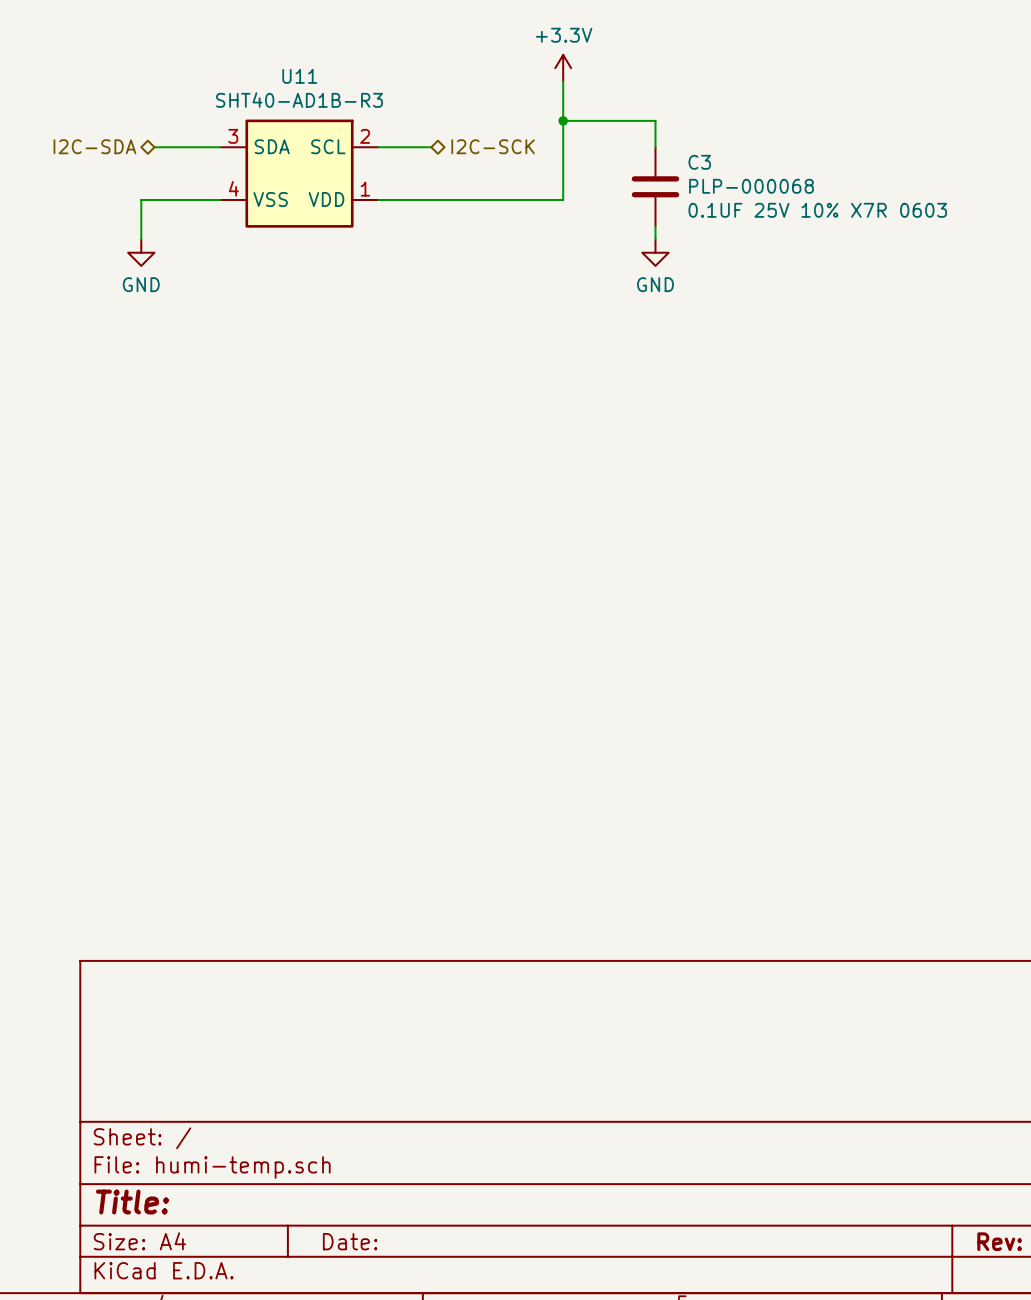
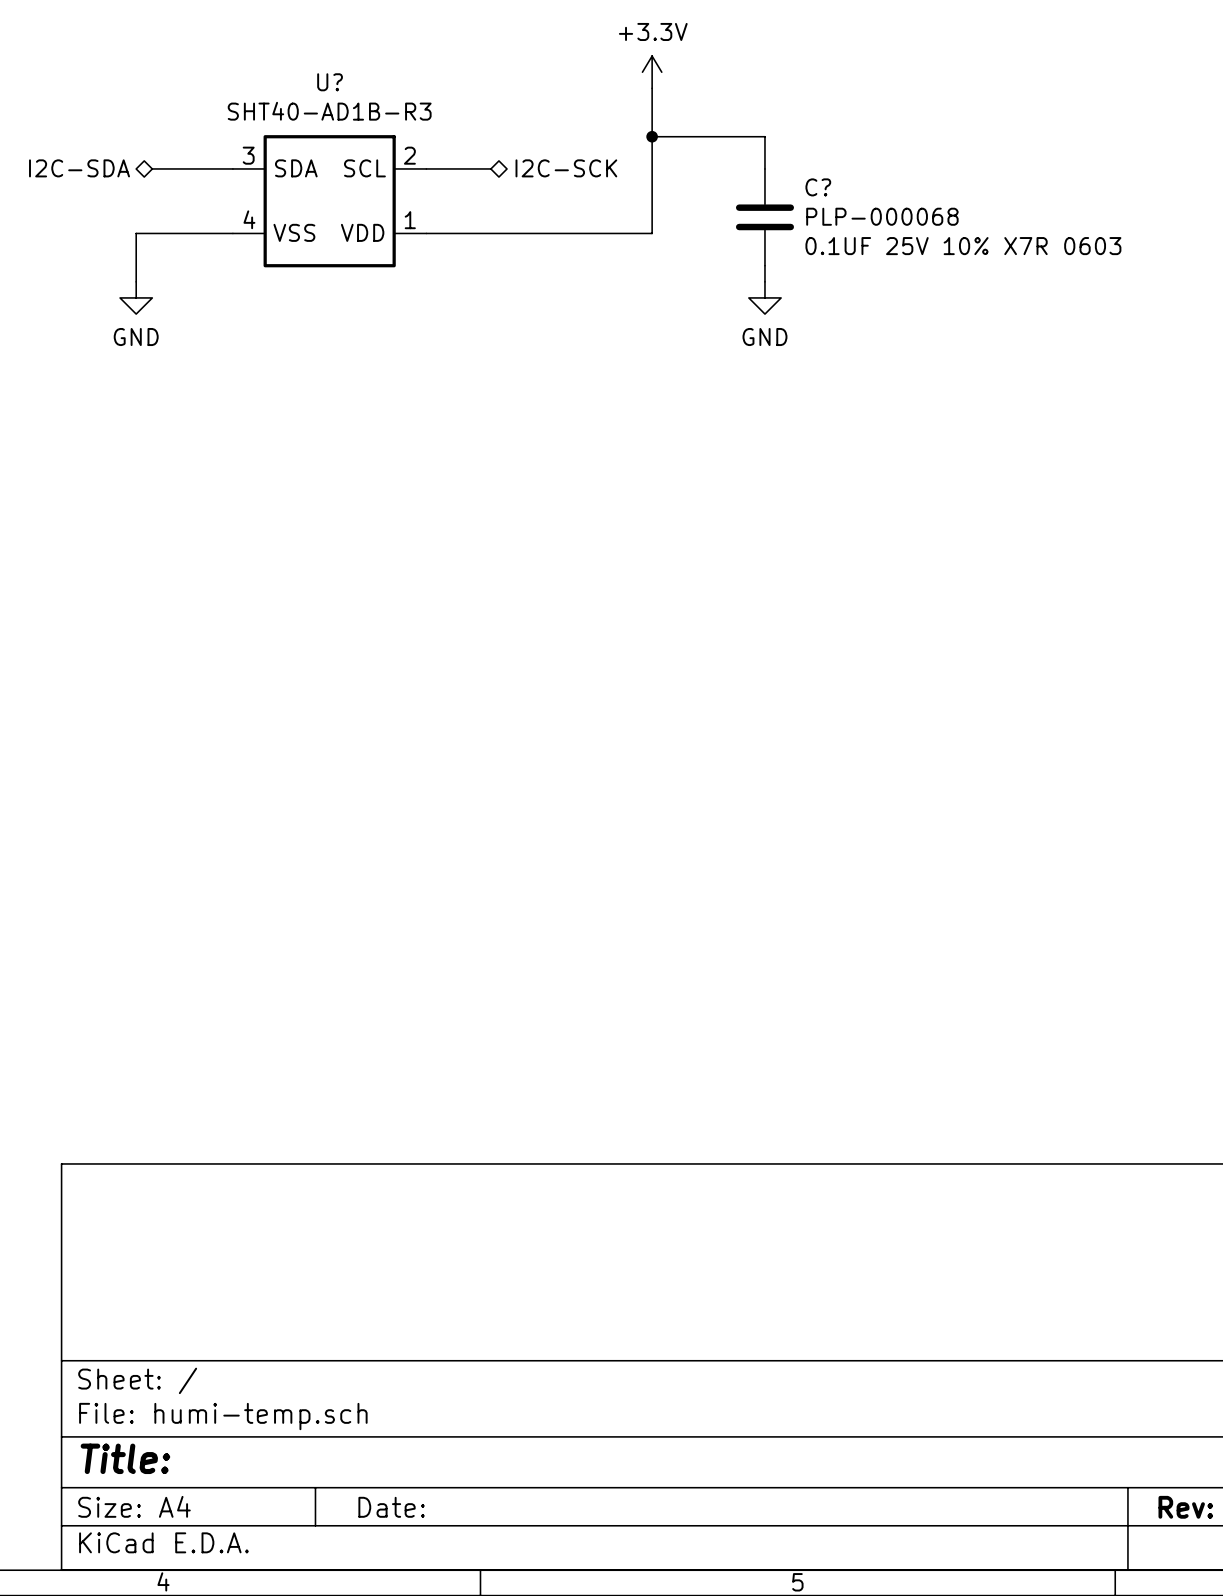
U11 name: U11 (299, 76) -> U? (330, 82)
C3 name: C3 (699, 162) -> C? (818, 187)

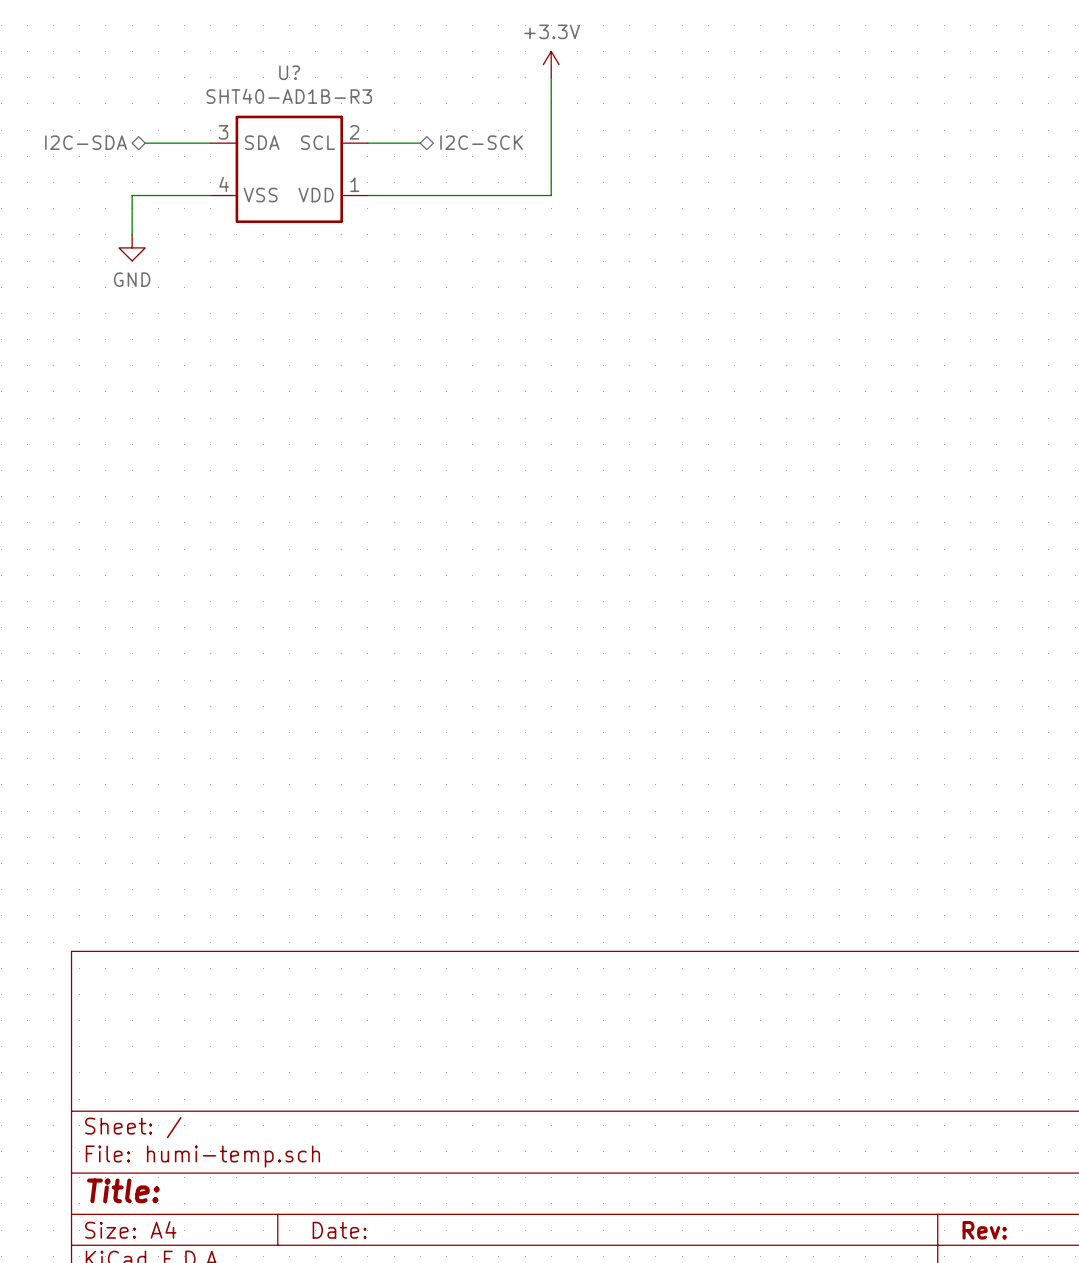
wire: (652, 136) (764, 136) (764, 168) -> none
junction: (652, 136) -> none
C?: PLP-000068 (764, 217) -> none
wire: (764, 265) (764, 281) -> none
power symbol: GND (764, 297) -> none

